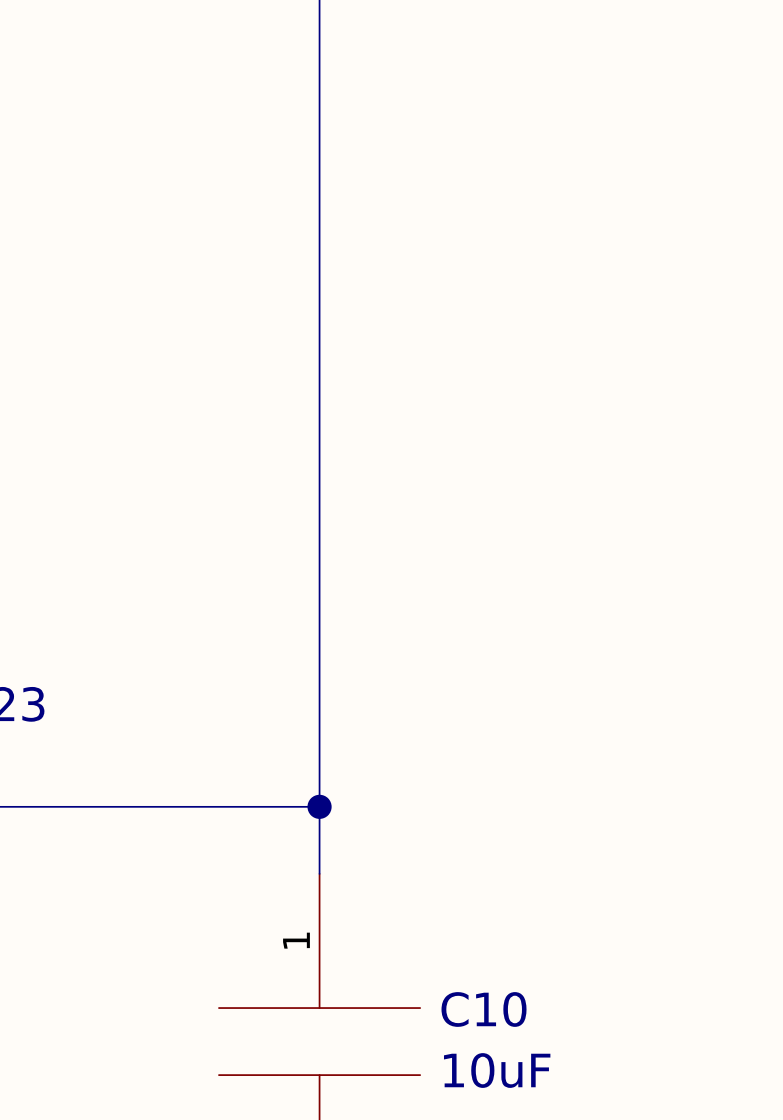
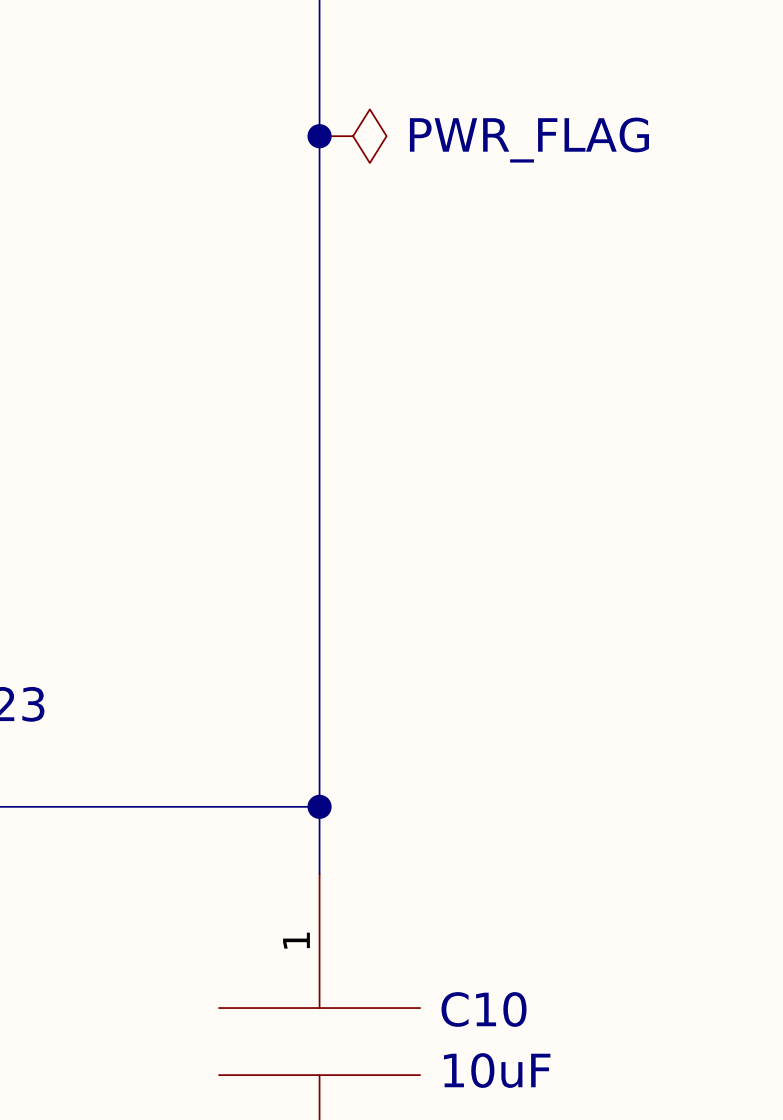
junction: none -> (319, 136)
power symbol: none -> PWR_FLAG (353, 136)

